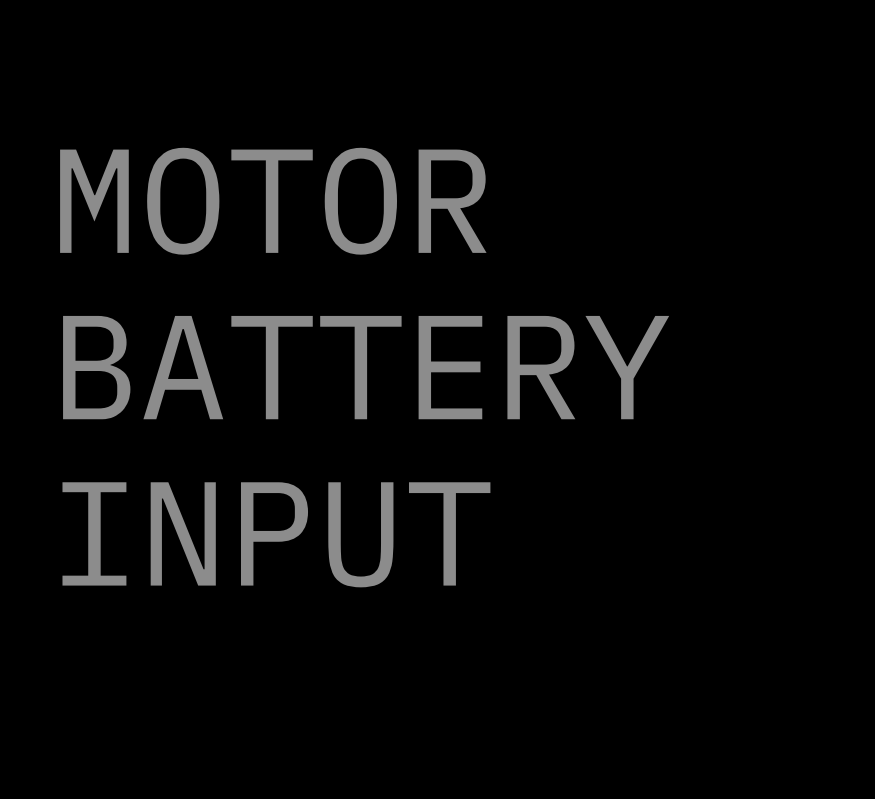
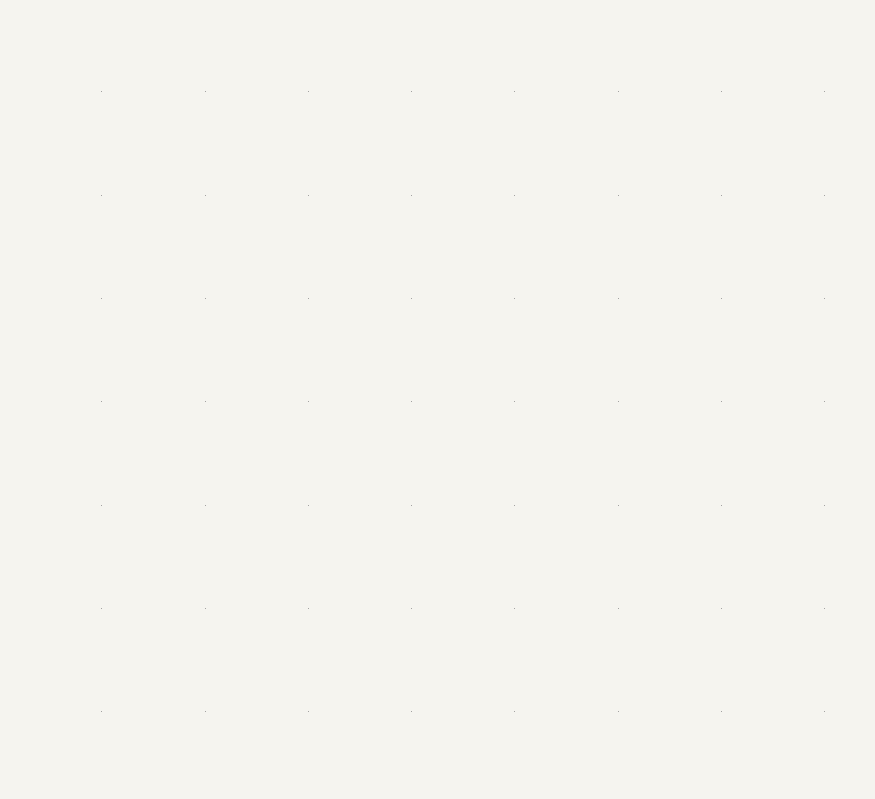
text: MOTOR (273, 201) -> none
text: BATTERY (366, 367) -> none
text: INPUT (276, 534) -> none

